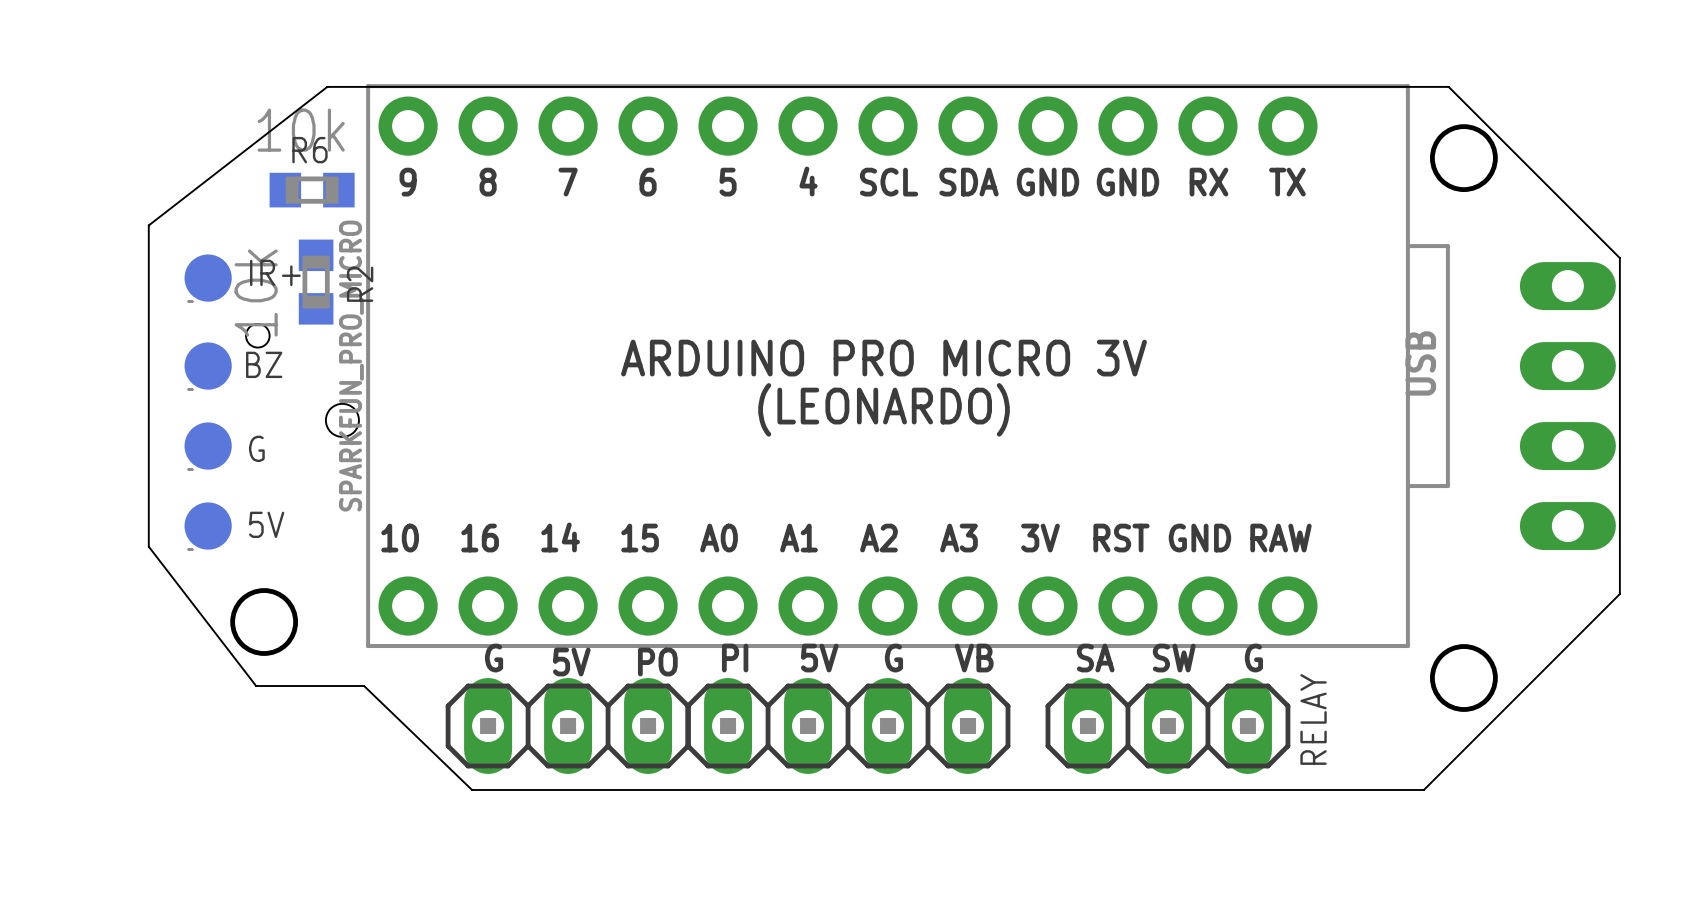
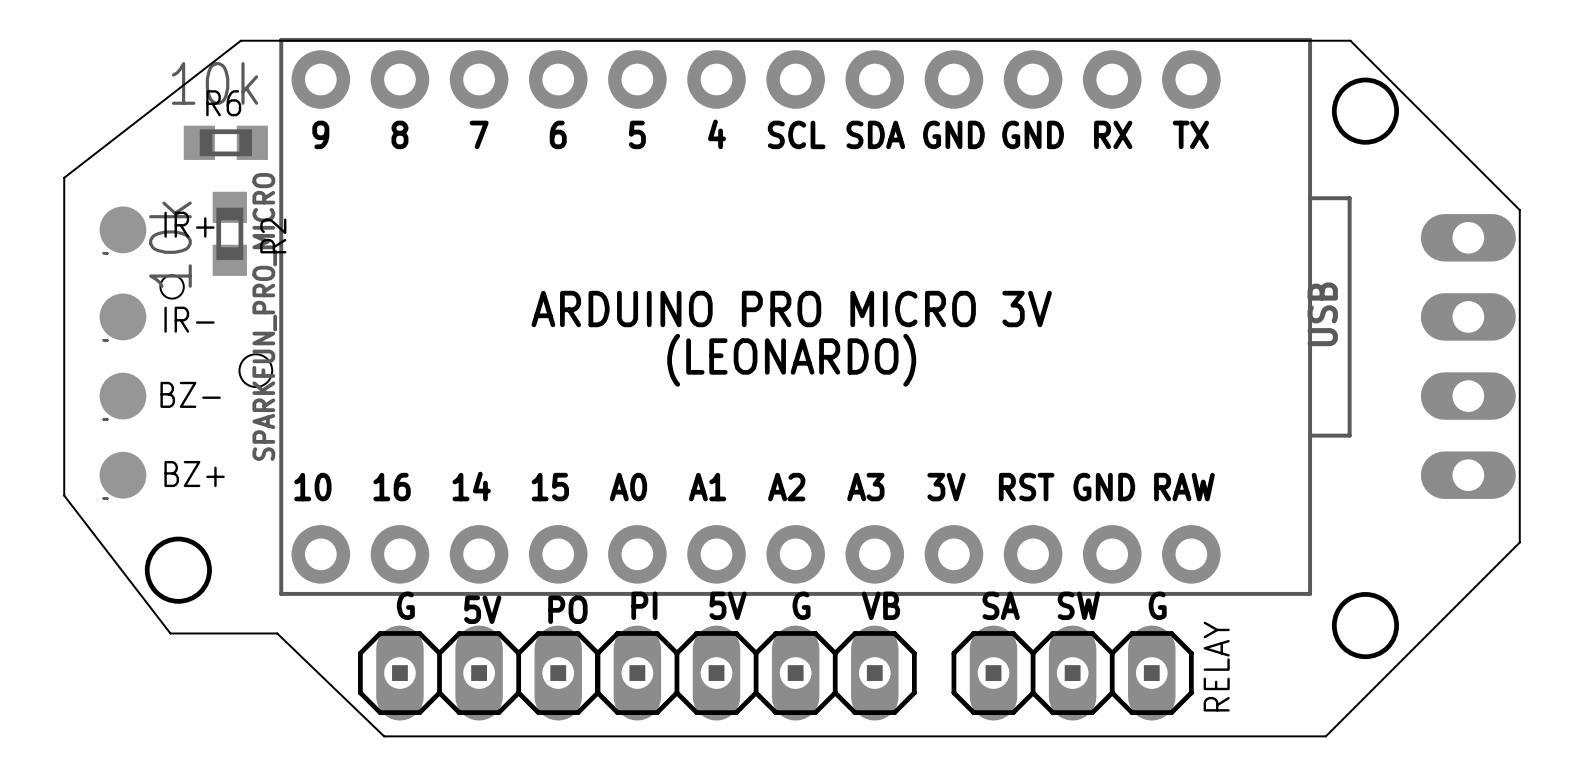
BZ name: BZ (264, 364) -> IR- (189, 319)
G name: G (256, 448) -> BZ- (190, 394)
5V name: 5V (266, 524) -> BZ+ (194, 474)

